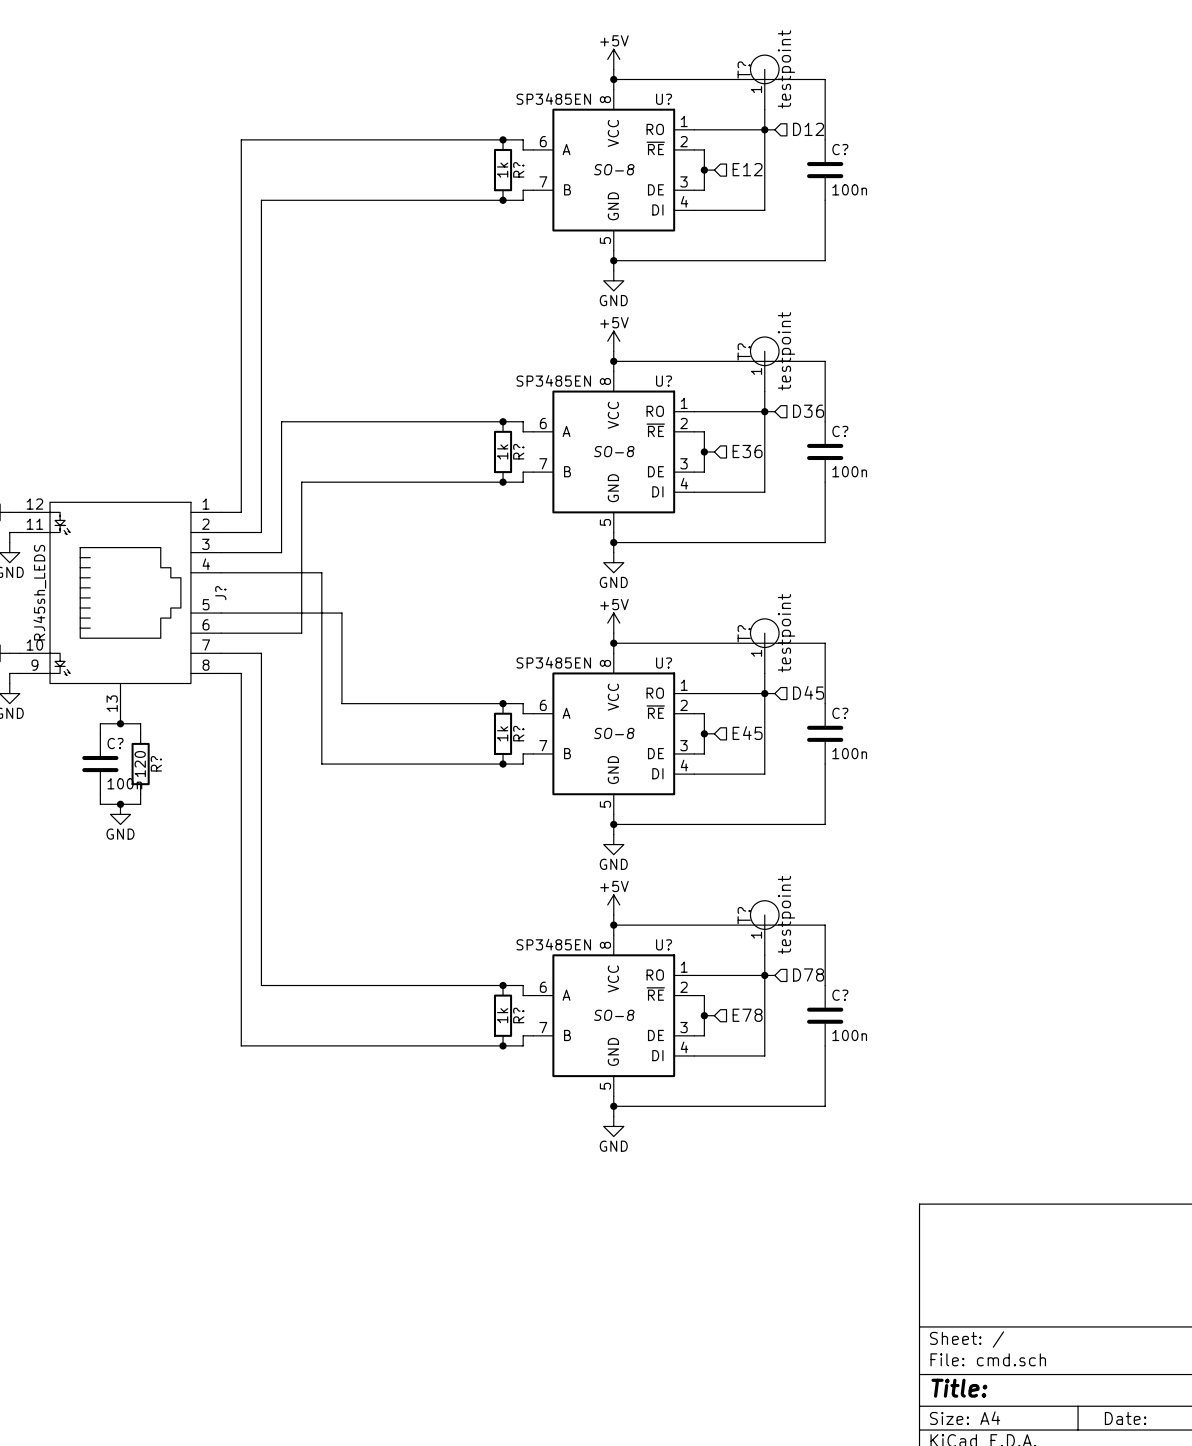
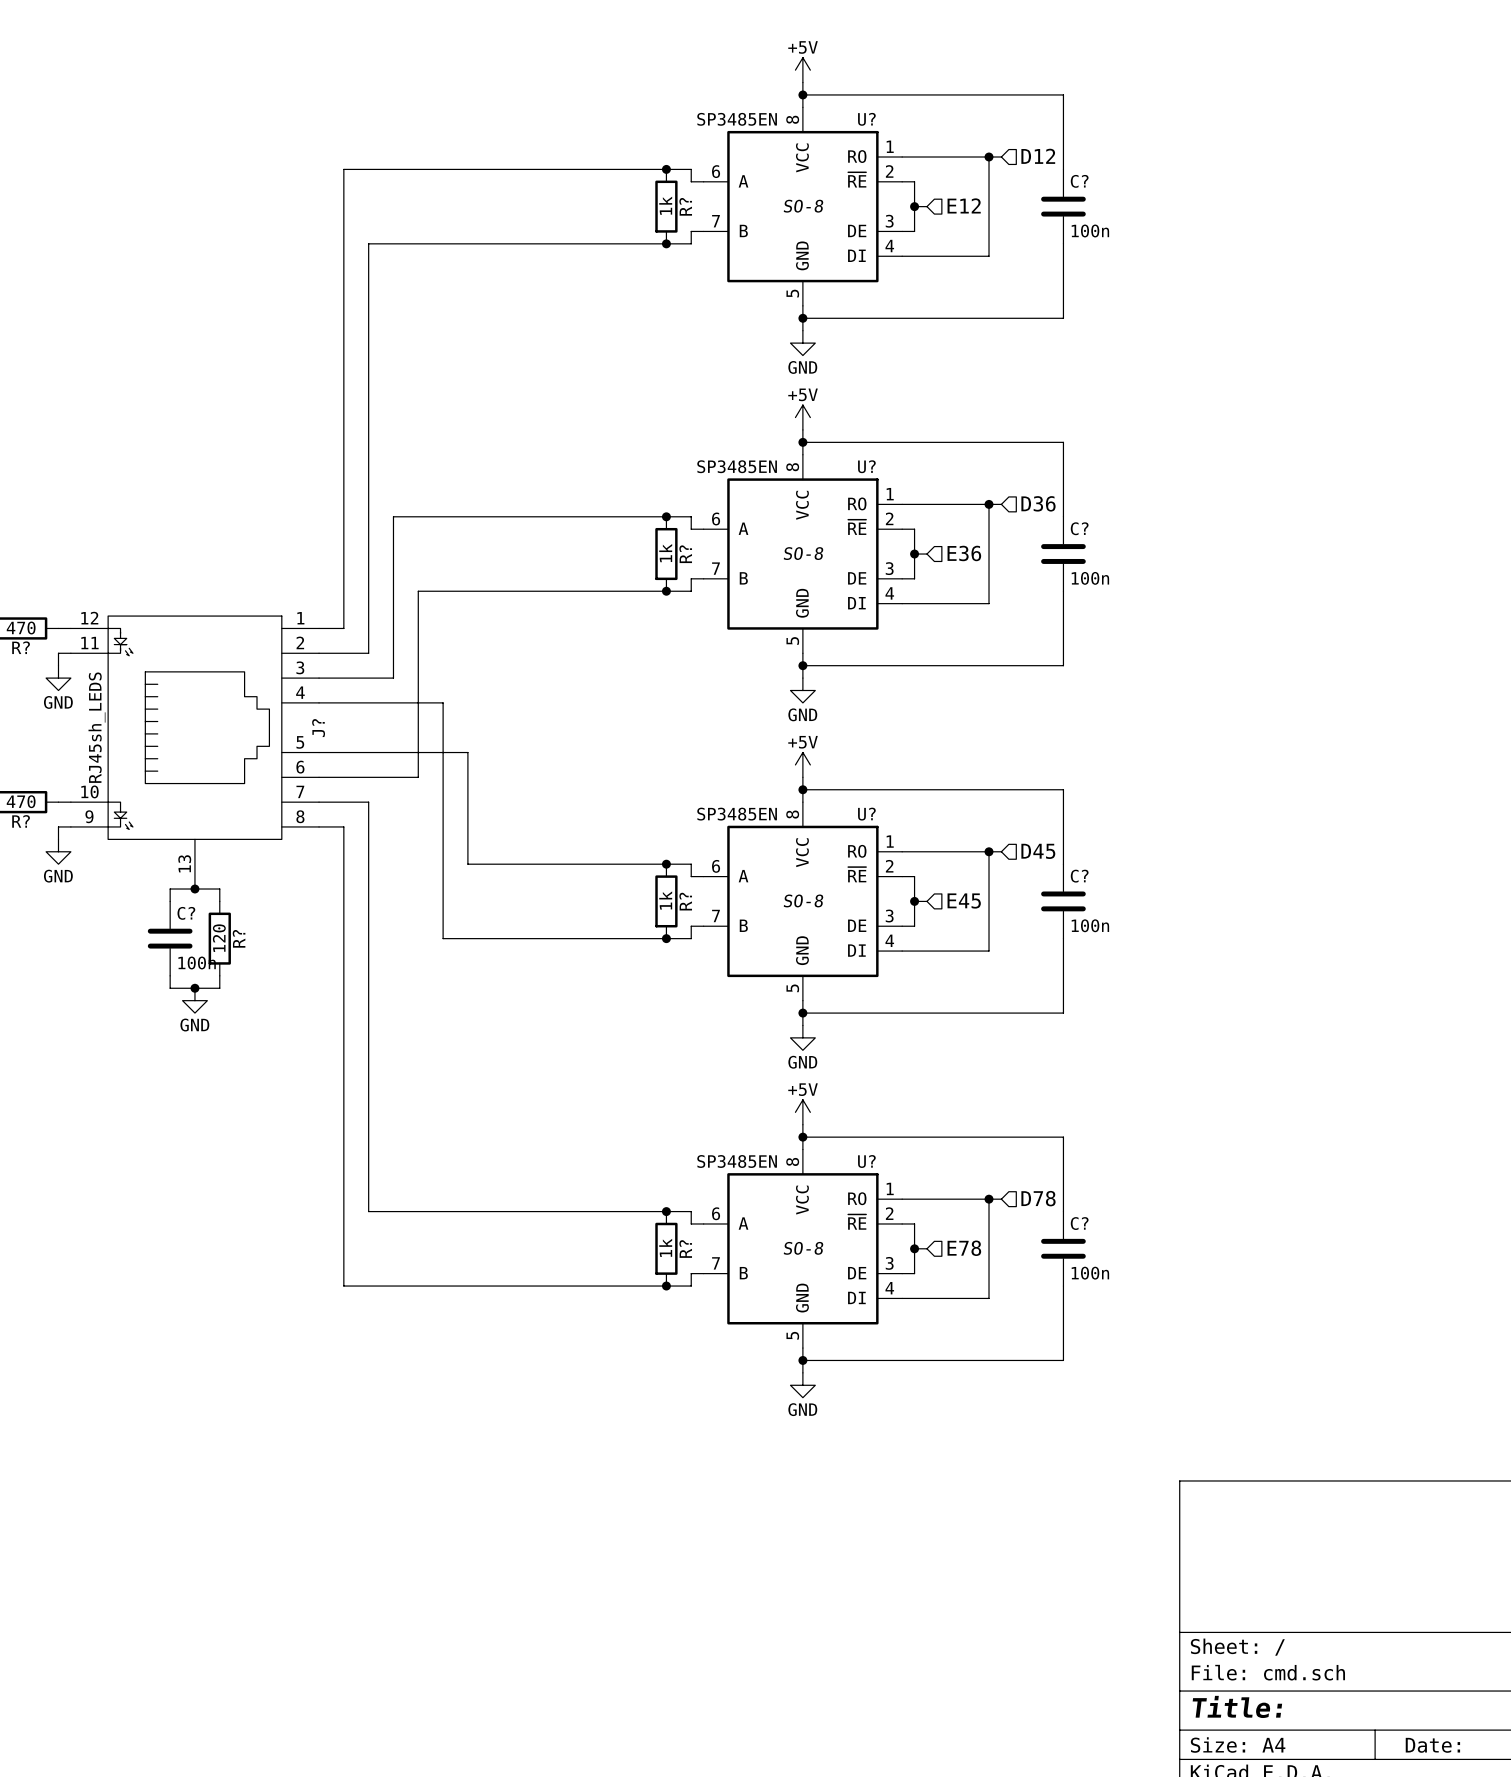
T?: testpoint (764, 82) -> none
wire: (764, 109) (764, 129) -> none
T?: testpoint (764, 364) -> none
wire: (764, 391) (764, 411) -> none
T?: testpoint (764, 646) -> none
wire: (764, 673) (764, 693) -> none
T?: testpoint (764, 928) -> none
wire: (764, 955) (764, 975) -> none

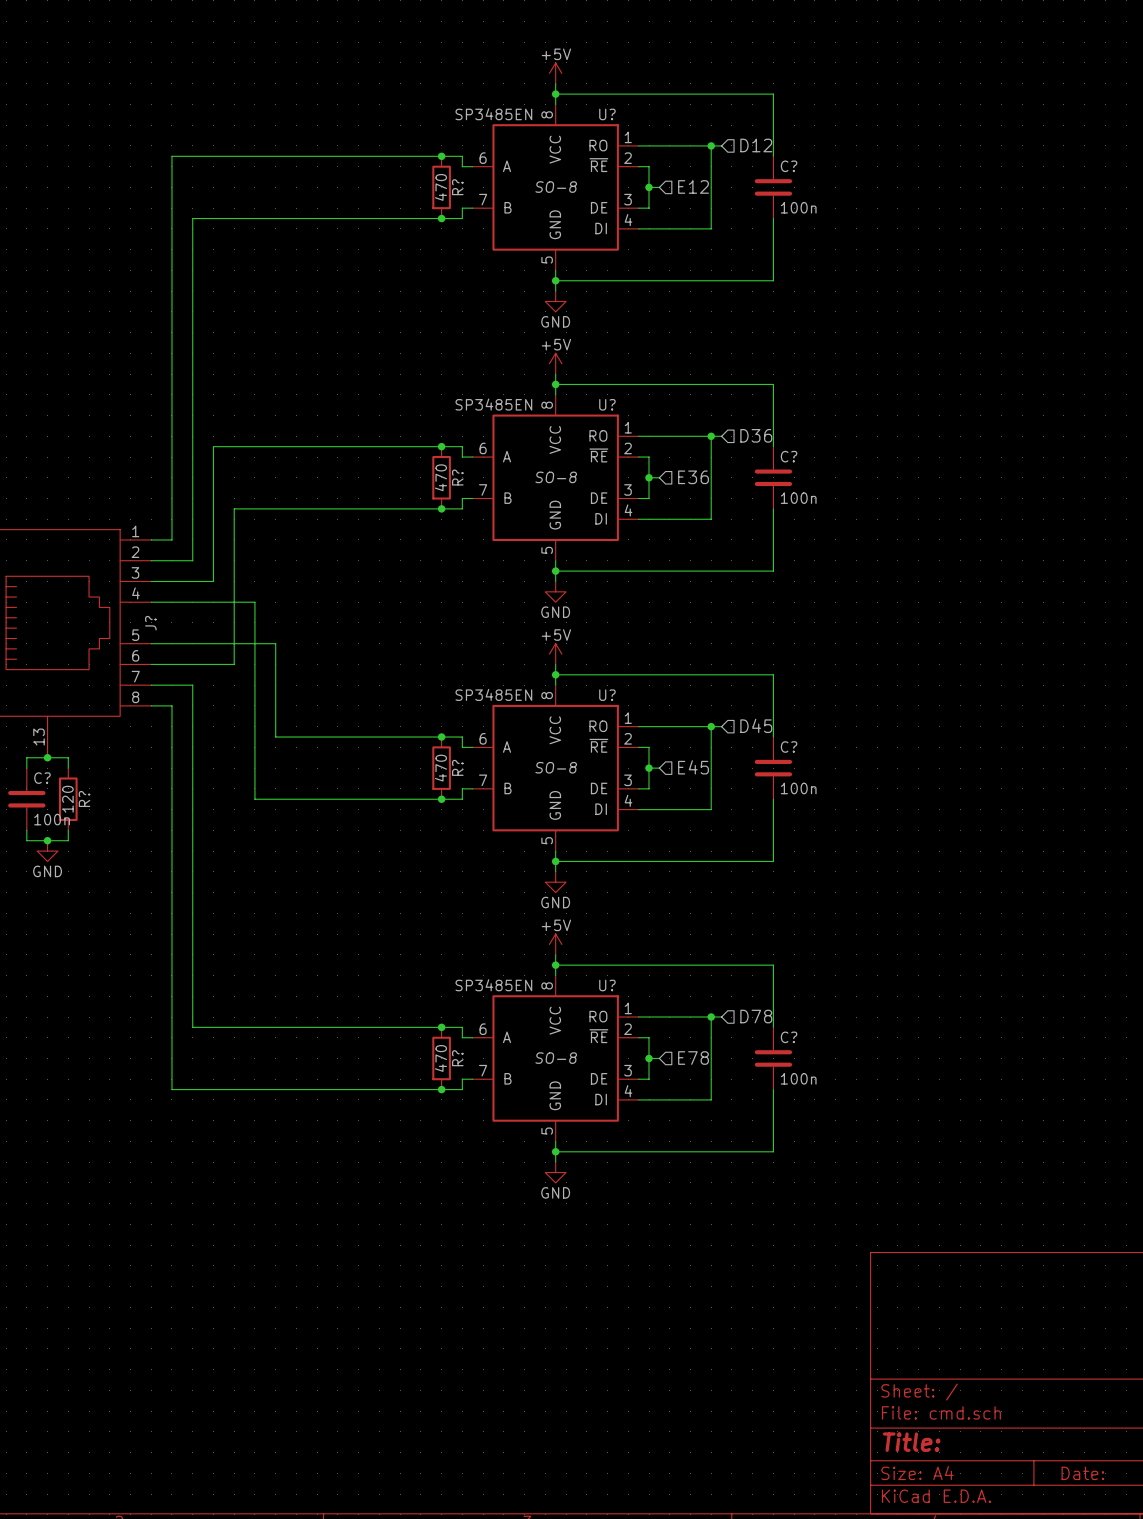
R? value: 1k (665, 205) -> 470 (440, 187)
R? value: 1k (665, 553) -> 470 (440, 477)
R? value: 1k (665, 900) -> 470 (440, 768)
R? value: 1k (665, 1247) -> 470 (440, 1058)

